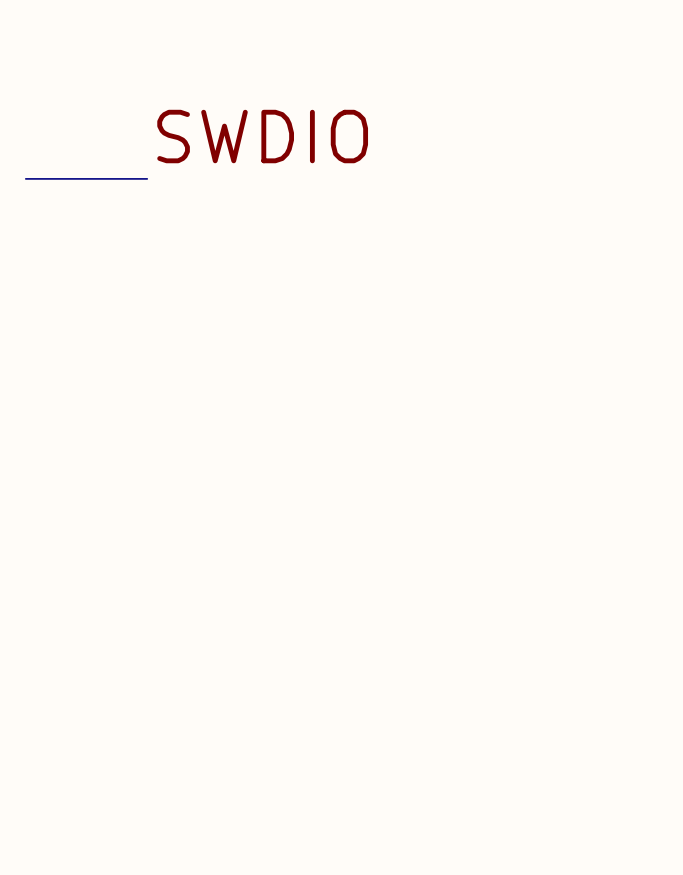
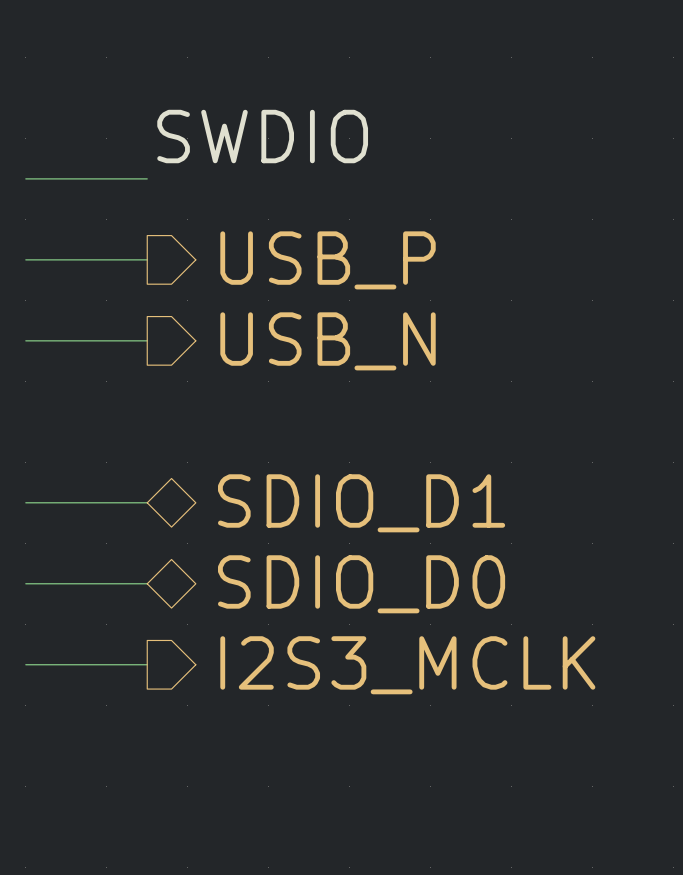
wire: none -> (25, 259) (147, 259)
hierarchical label: none -> USB_P (328, 260)
wire: none -> (25, 340) (147, 340)
hierarchical label: none -> USB_N (328, 341)
wire: none -> (25, 502) (147, 502)
hierarchical label: none -> SDIO_D1 (361, 503)
wire: none -> (25, 583) (147, 583)
hierarchical label: none -> SDIO_D0 (361, 584)
wire: none -> (25, 664) (147, 664)
hierarchical label: none -> I2S3_MCLK (407, 665)

